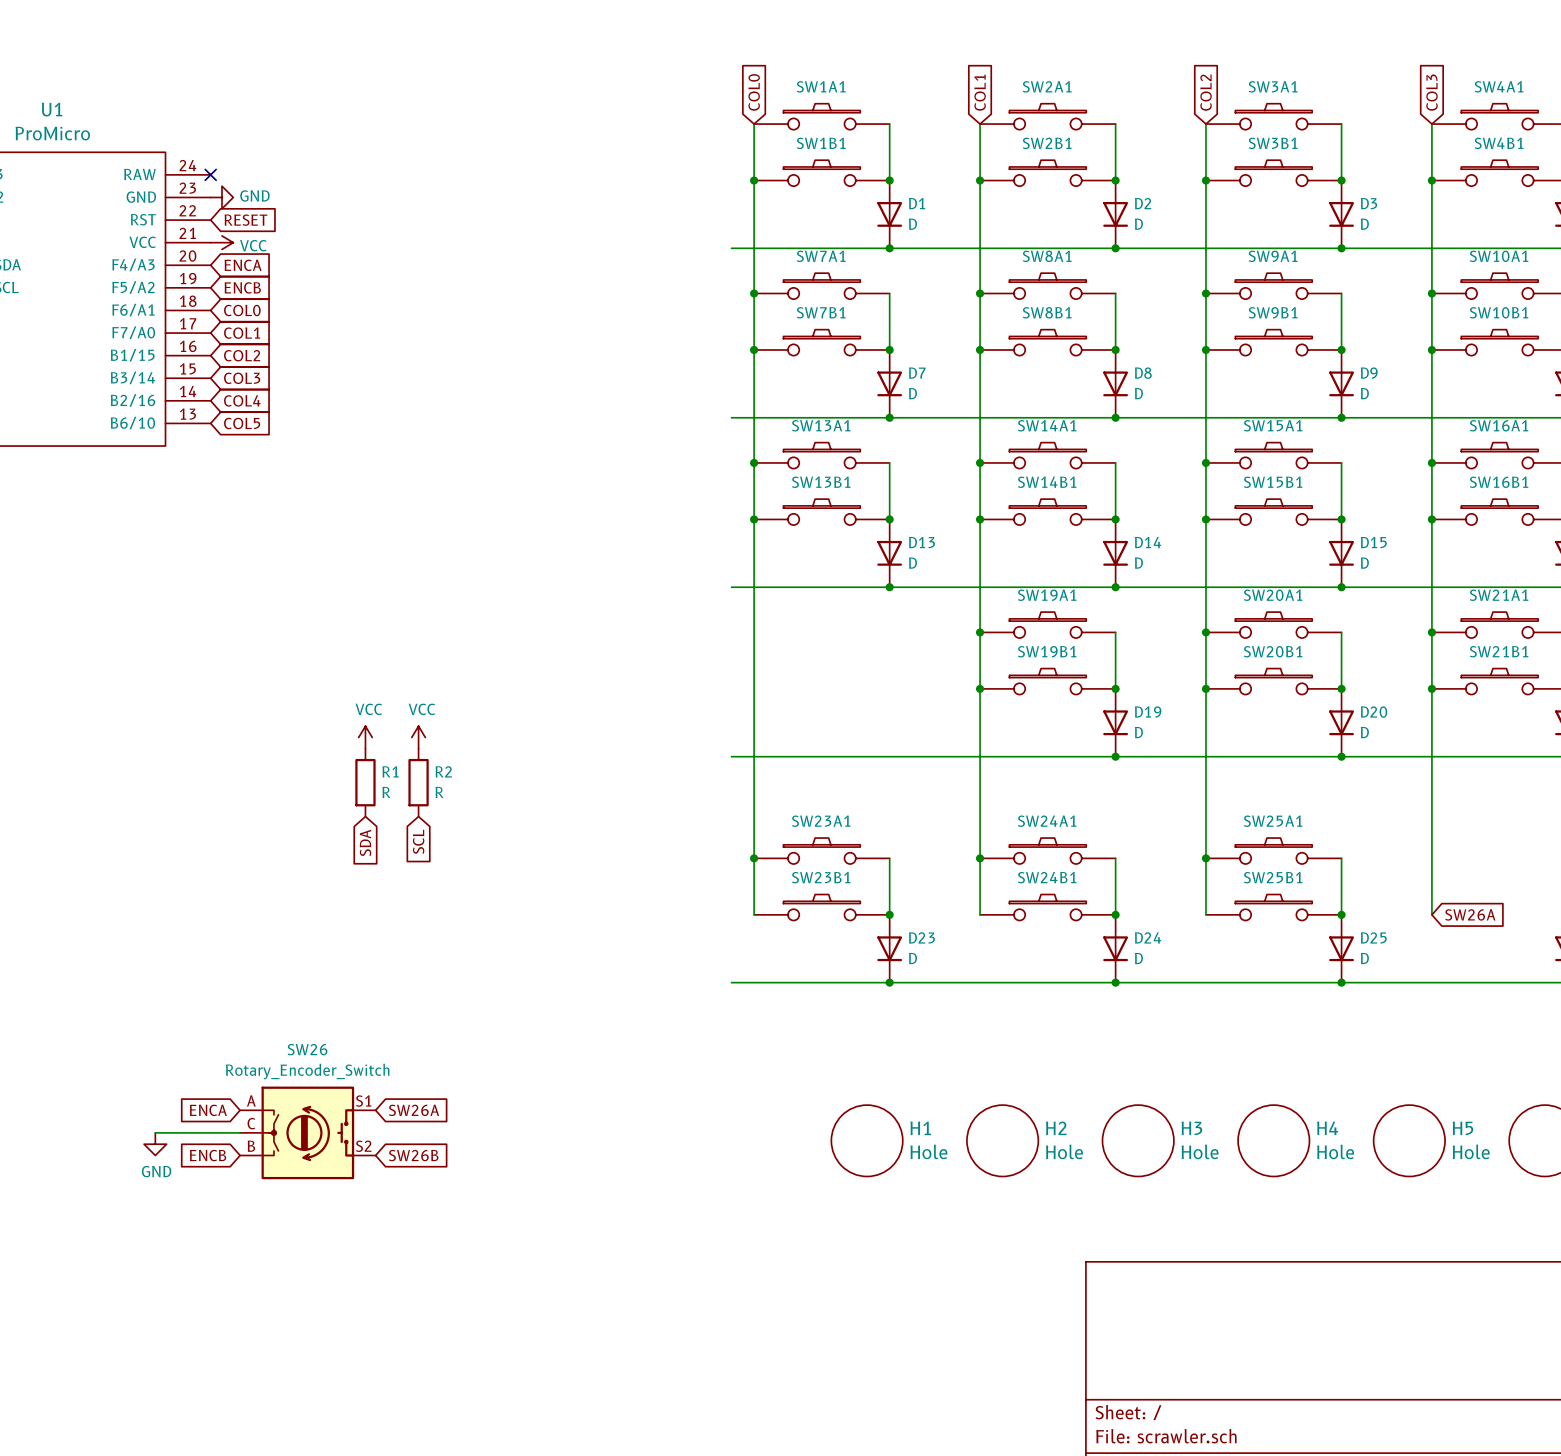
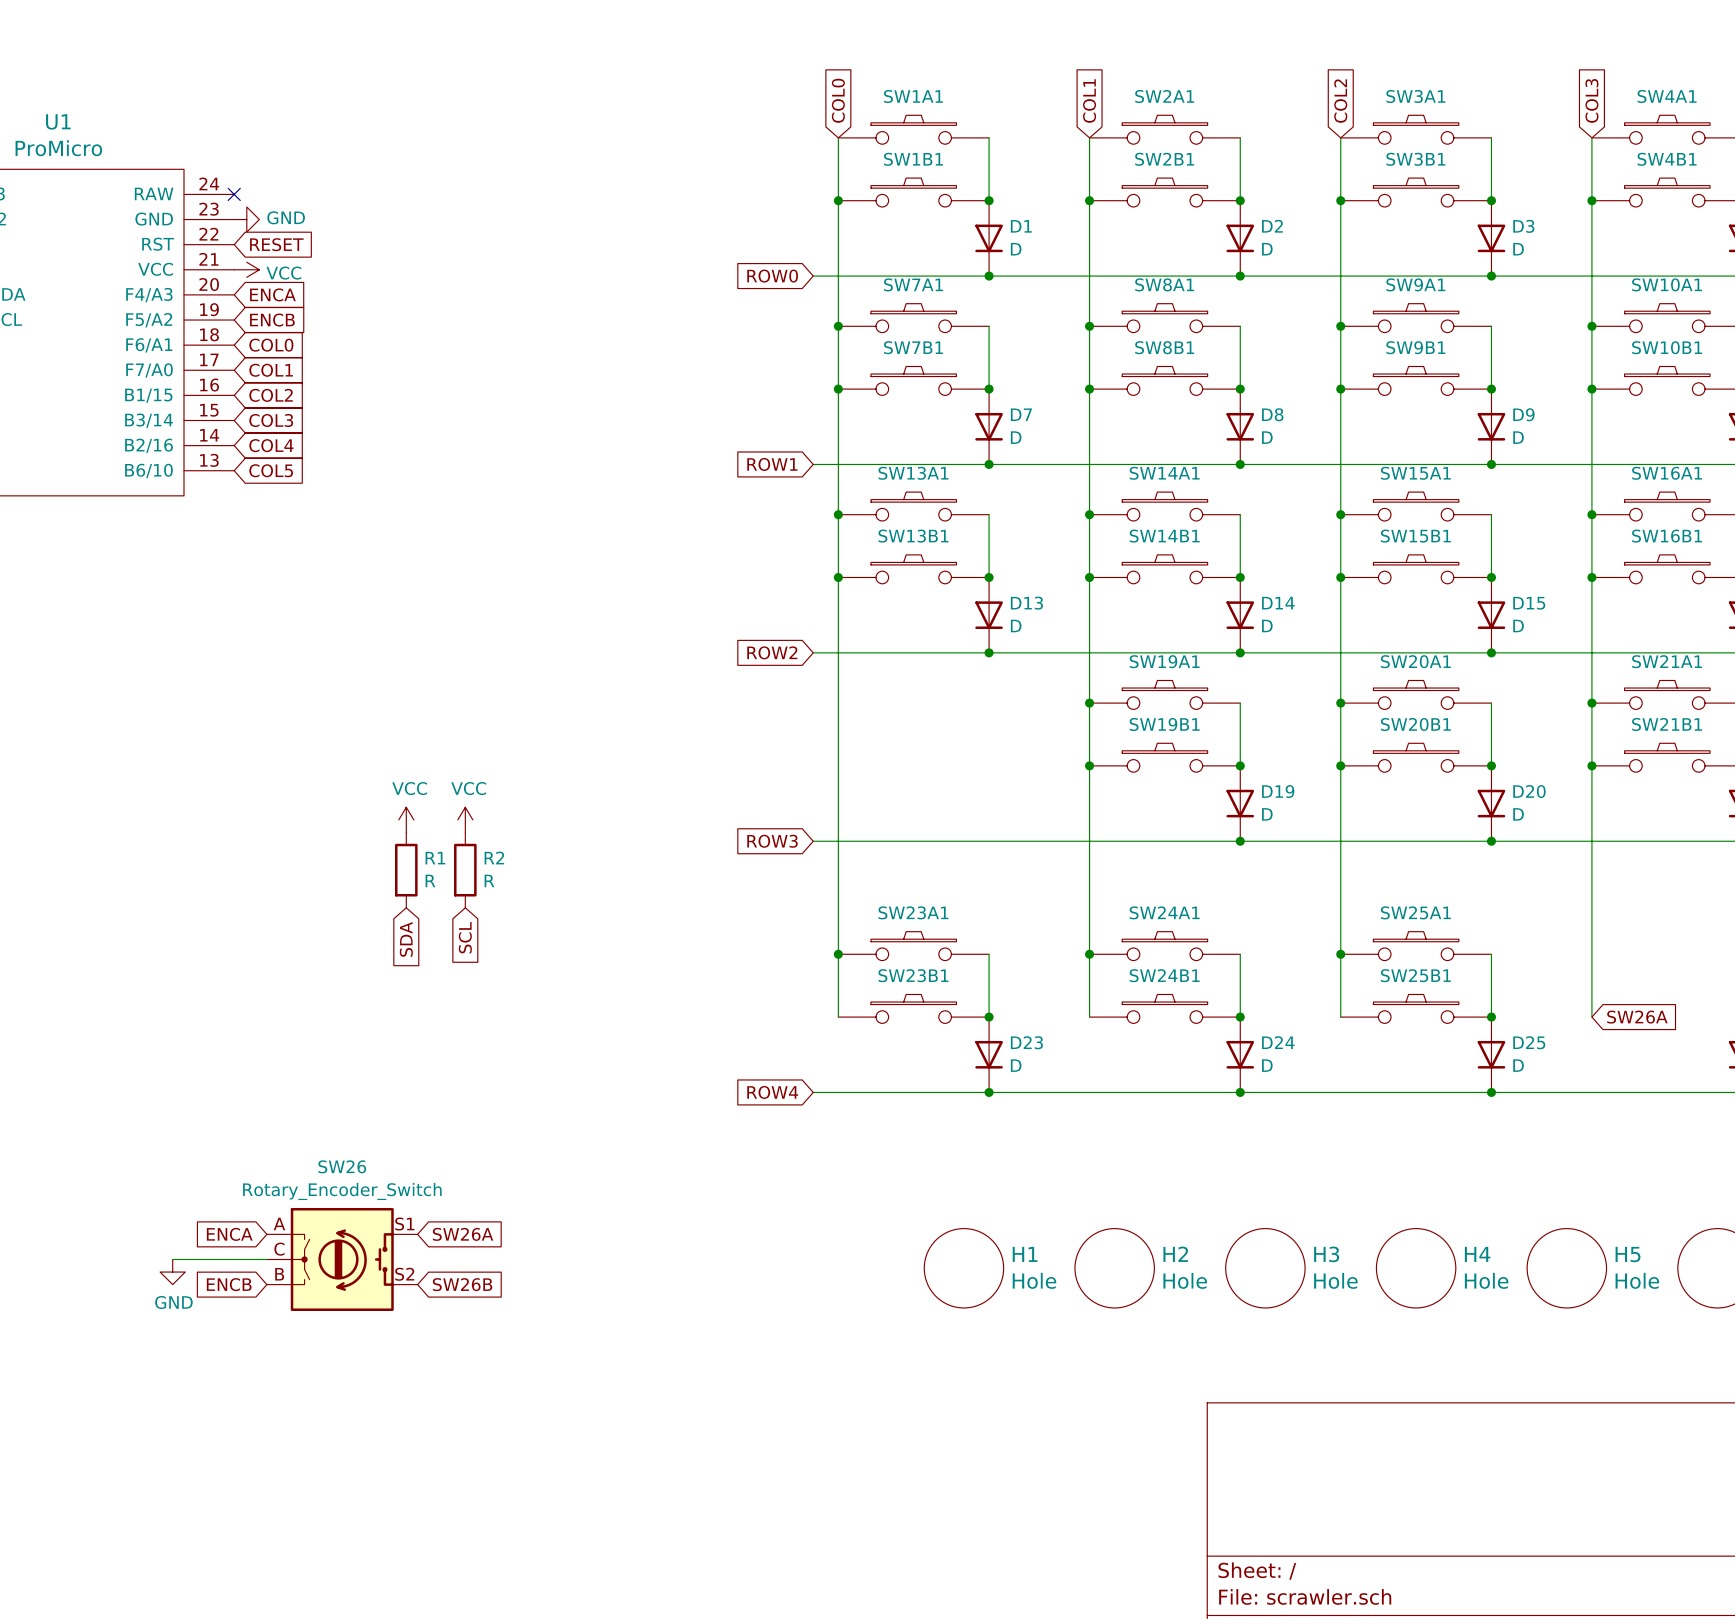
global label: none -> ROW0 (772, 276)
global label: none -> ROW1 (772, 464)
global label: none -> ROW2 (772, 652)
global label: none -> ROW3 (772, 841)
global label: none -> ROW4 (772, 1092)

